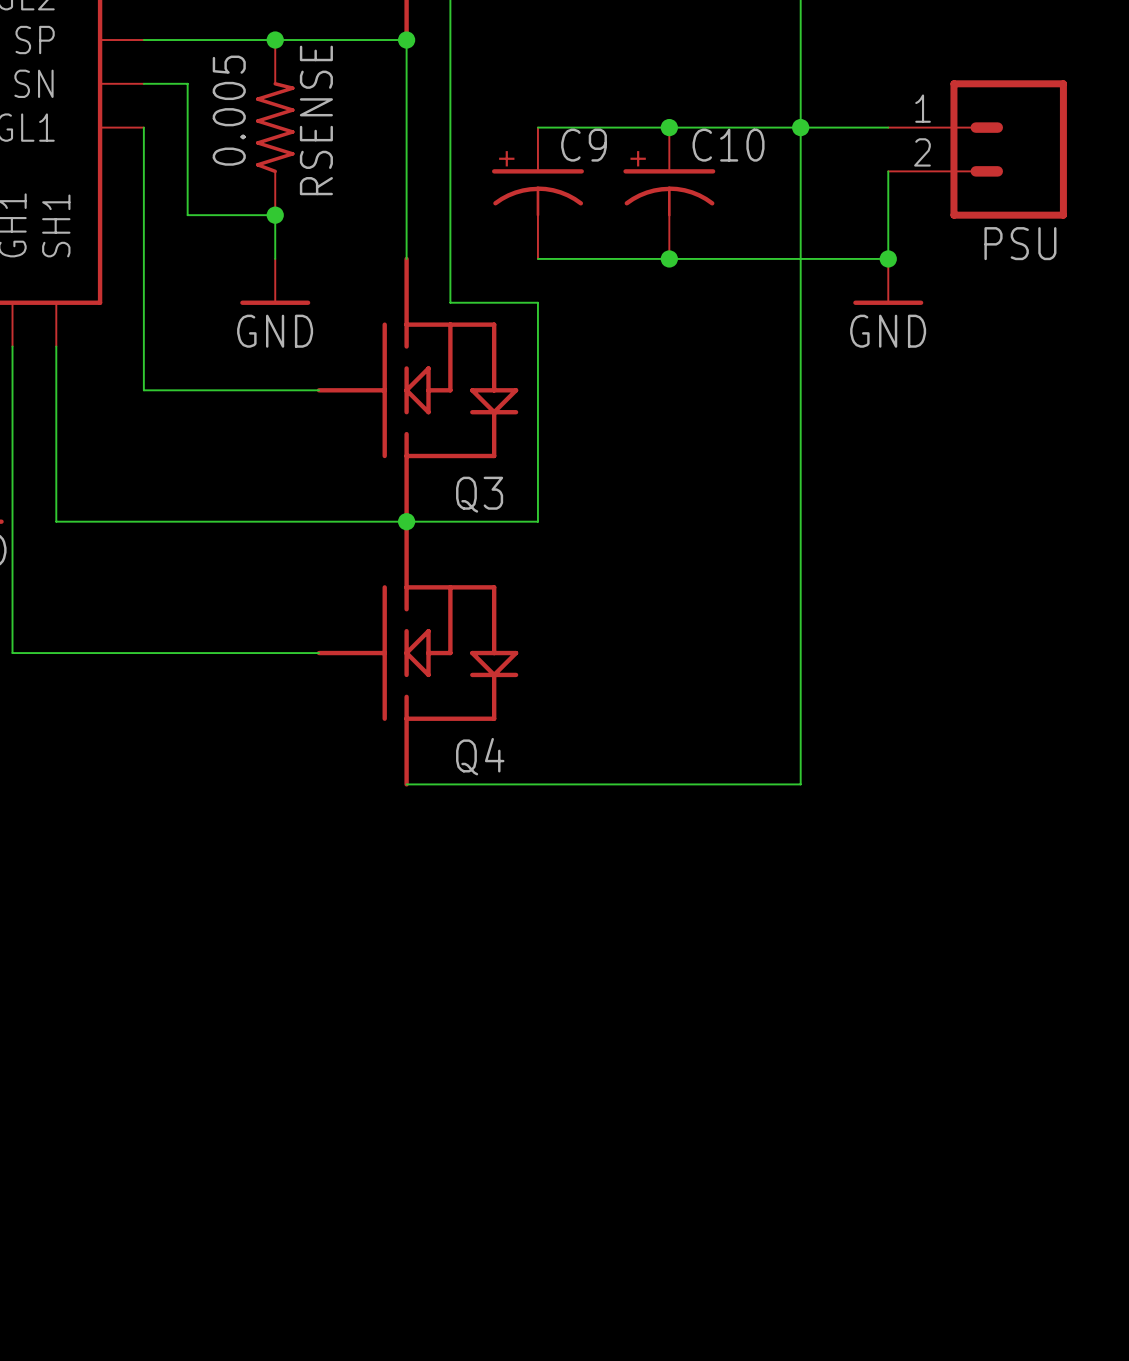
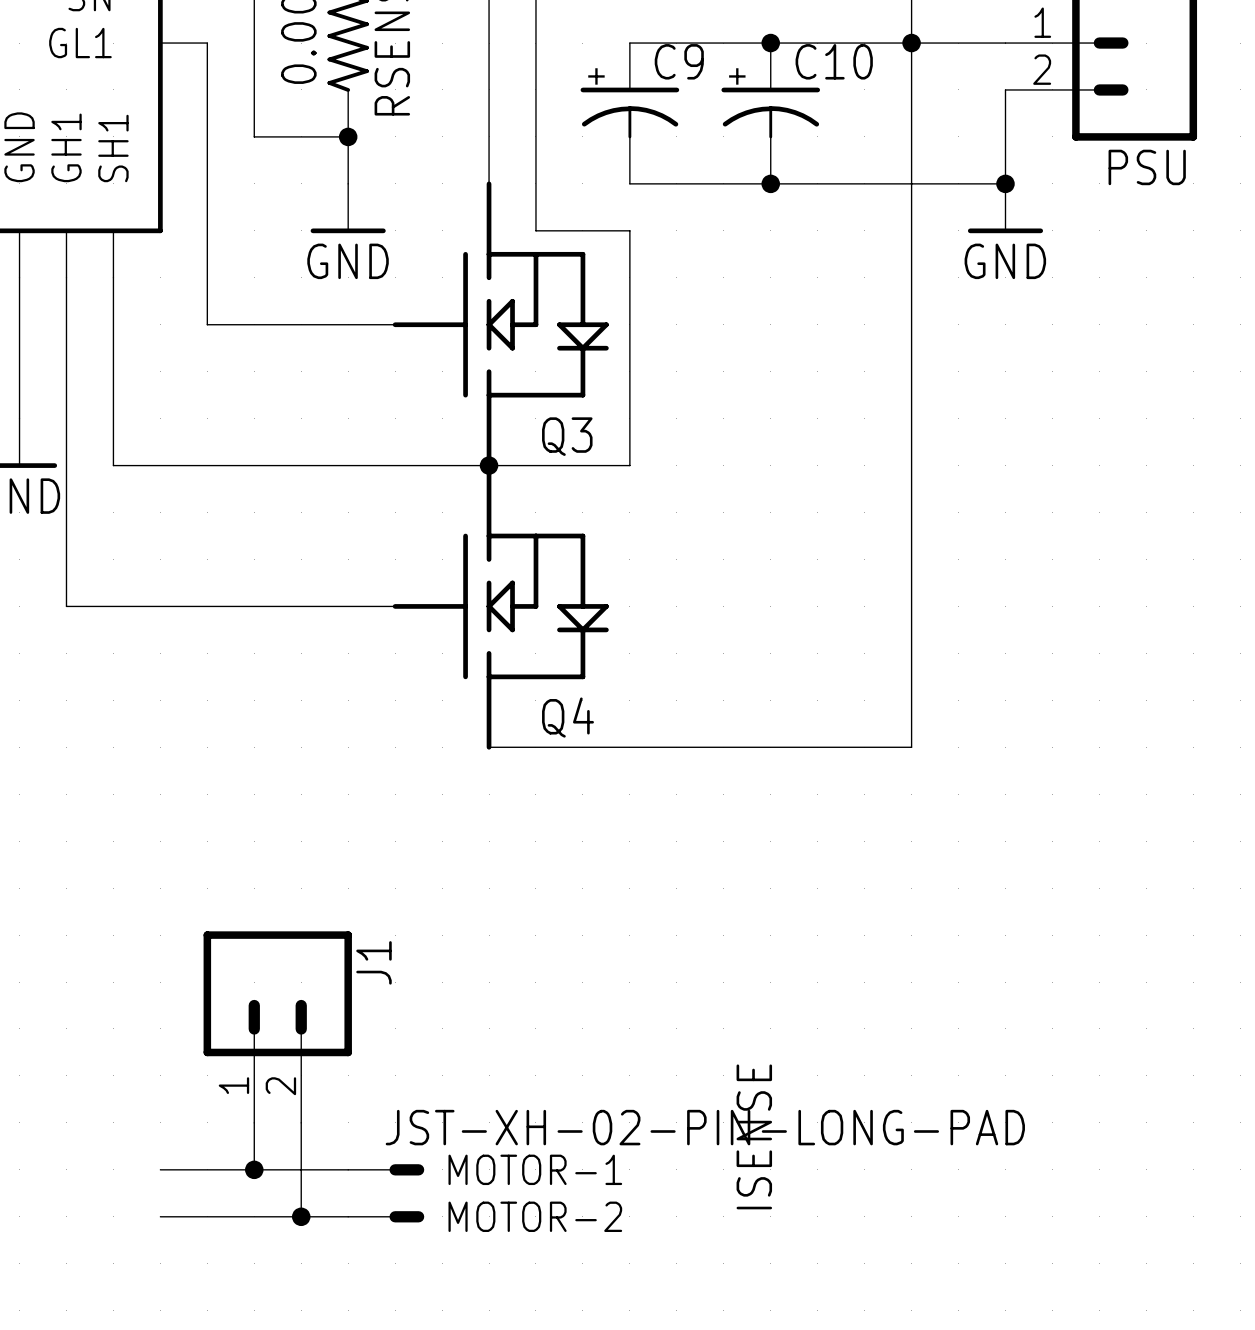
J1: none -> (277, 1027)
wire: none -> (254, 1122) (254, 1169)
wire: none -> (301, 1122) (301, 1216)
label: none -> ISENSE (754, 1136)
wire: none -> (160, 1169) (348, 1169)
junction: none -> (254, 1169)
MOTOR-1: none -> JST-XH-02-PIN-LONG-PAD (386, 1169)
wire: none -> (160, 1216) (348, 1216)
junction: none -> (301, 1216)
MOTOR-2: none -> (386, 1216)

